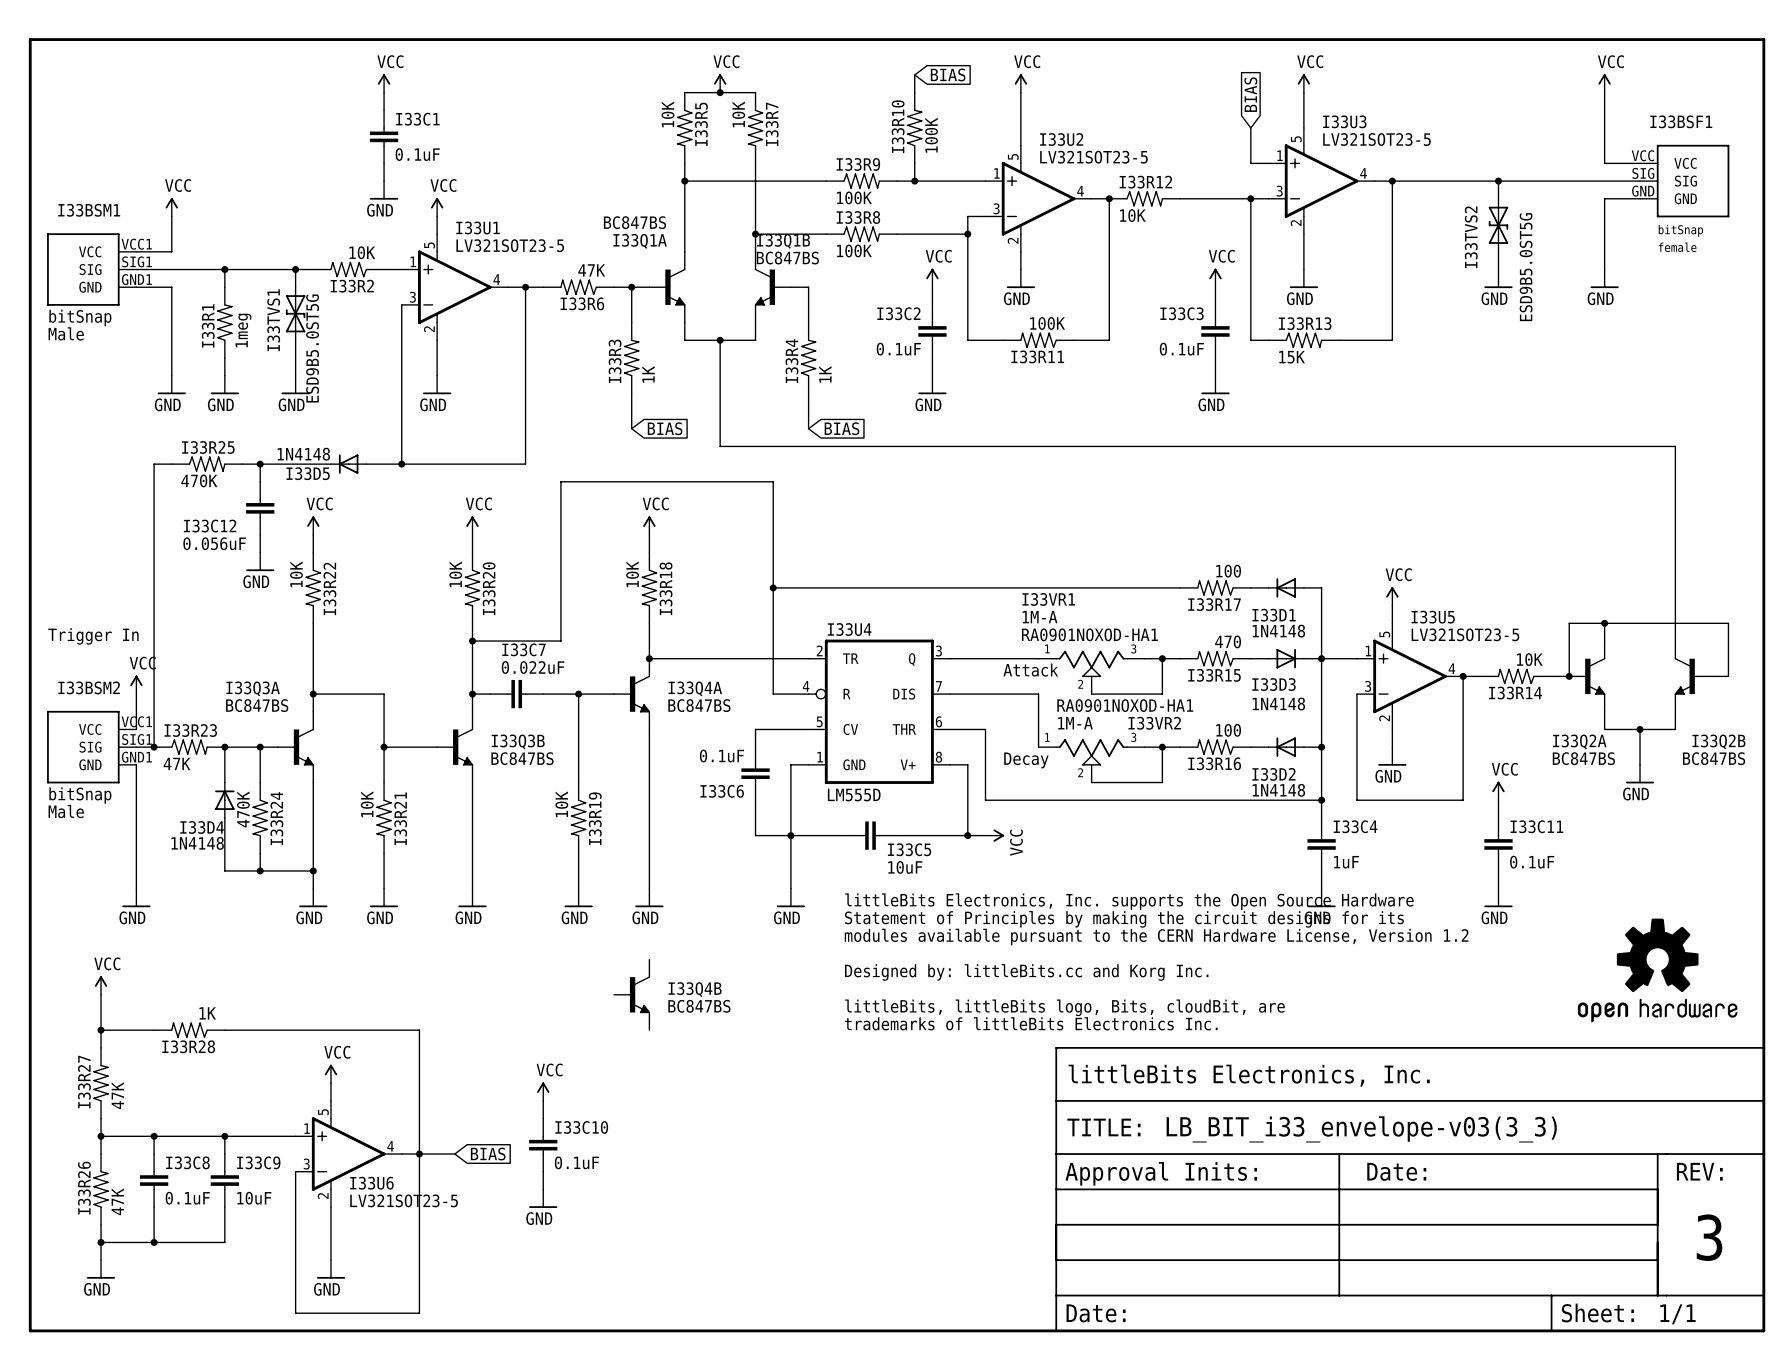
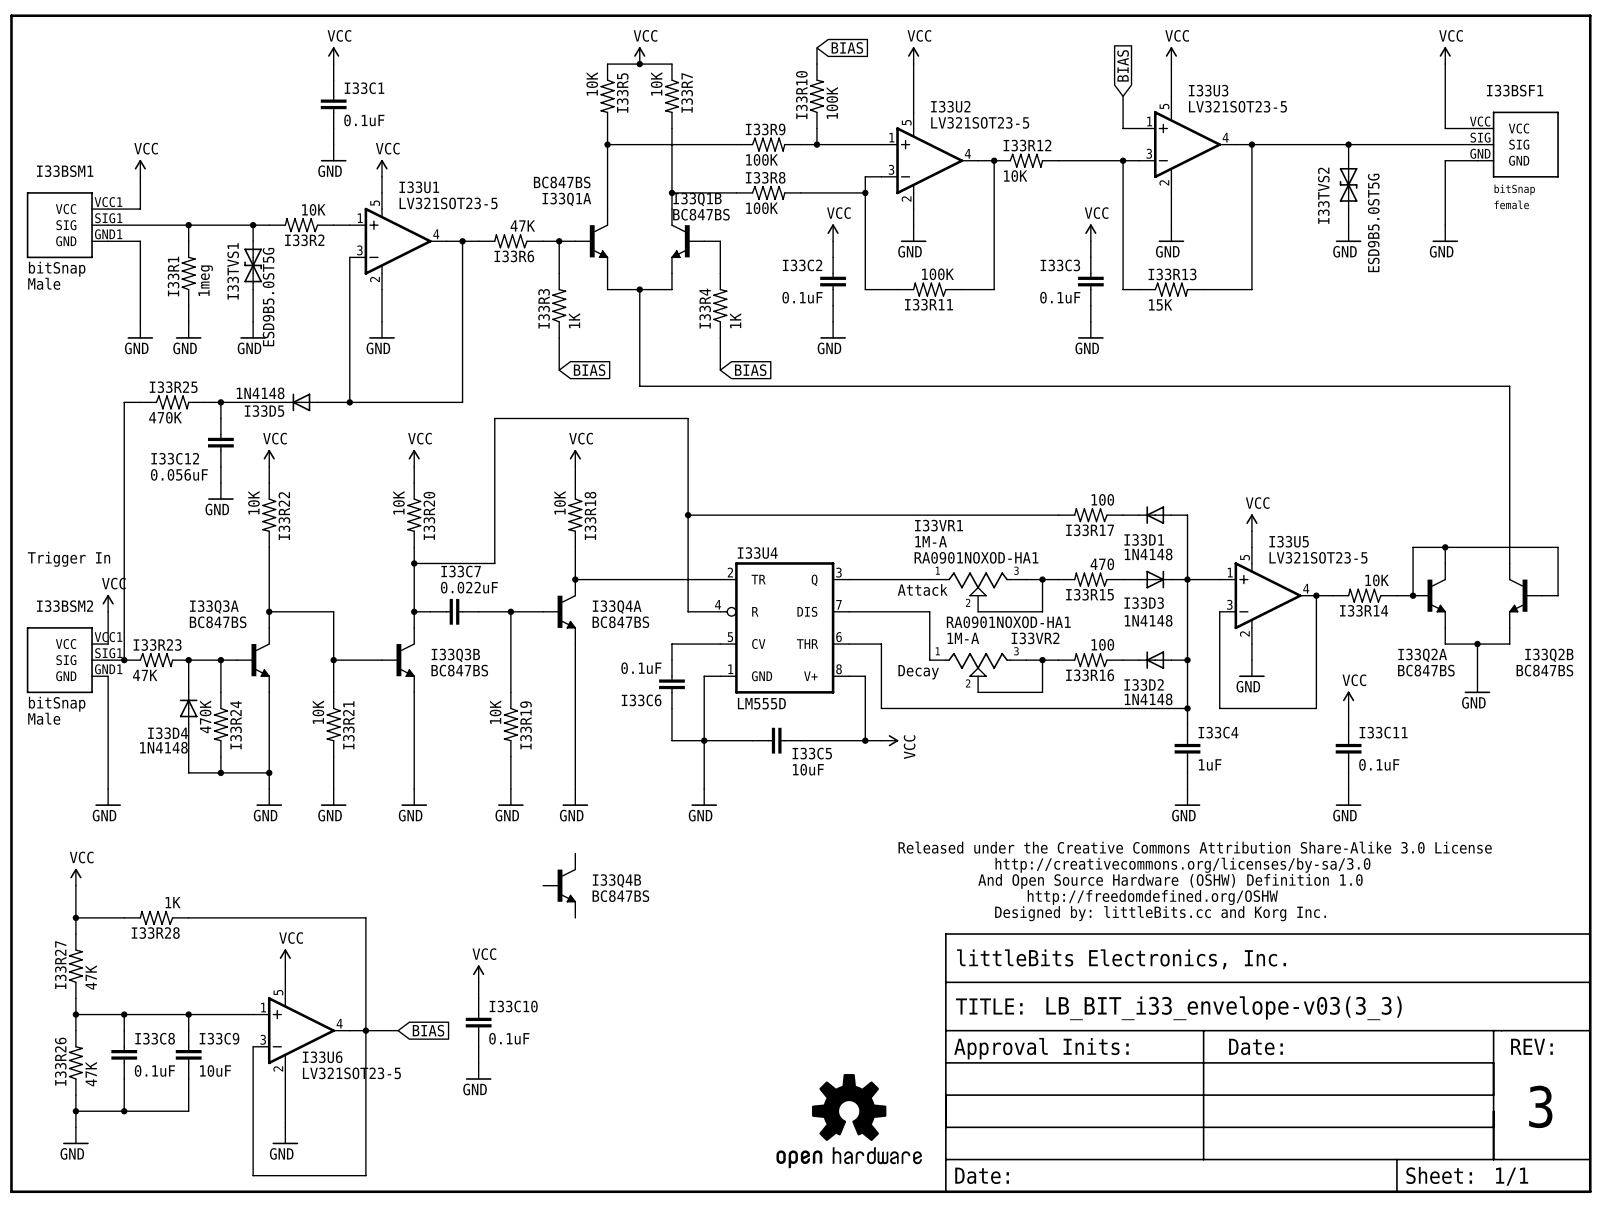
part: (1156, 961) -> none
part: (1657, 970) -> none
part: none -> (1195, 881)
part: none -> (849, 1121)

